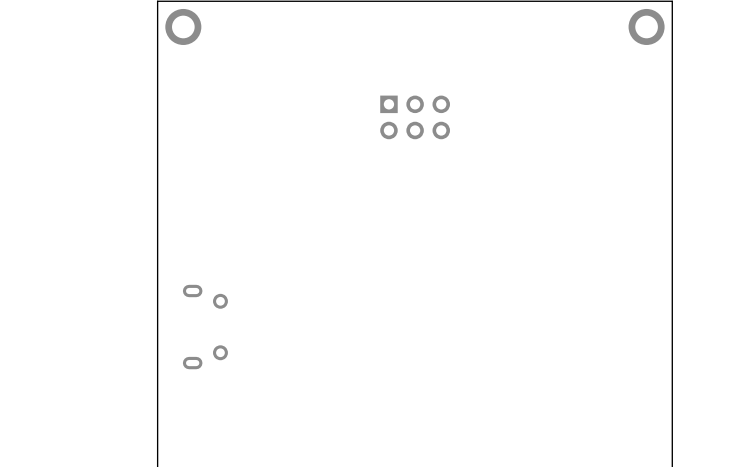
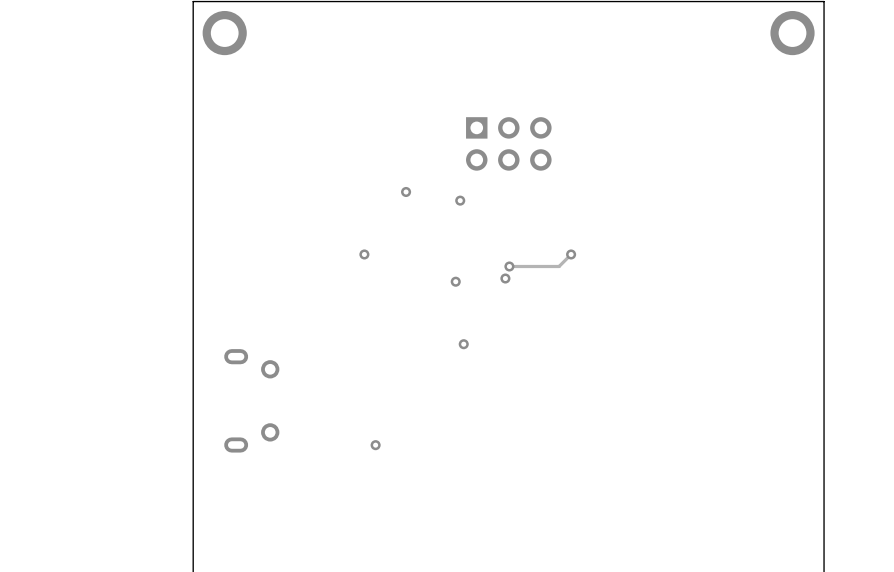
via: none -> (406, 191)
via: none -> (460, 200)
via: none -> (364, 254)
track: none -> (571, 254) (559, 266) (509, 266)
via: none -> (571, 254)
via: none -> (509, 266)
via: none -> (505, 278)
via: none -> (455, 281)
via: none -> (463, 344)
via: none -> (375, 445)

